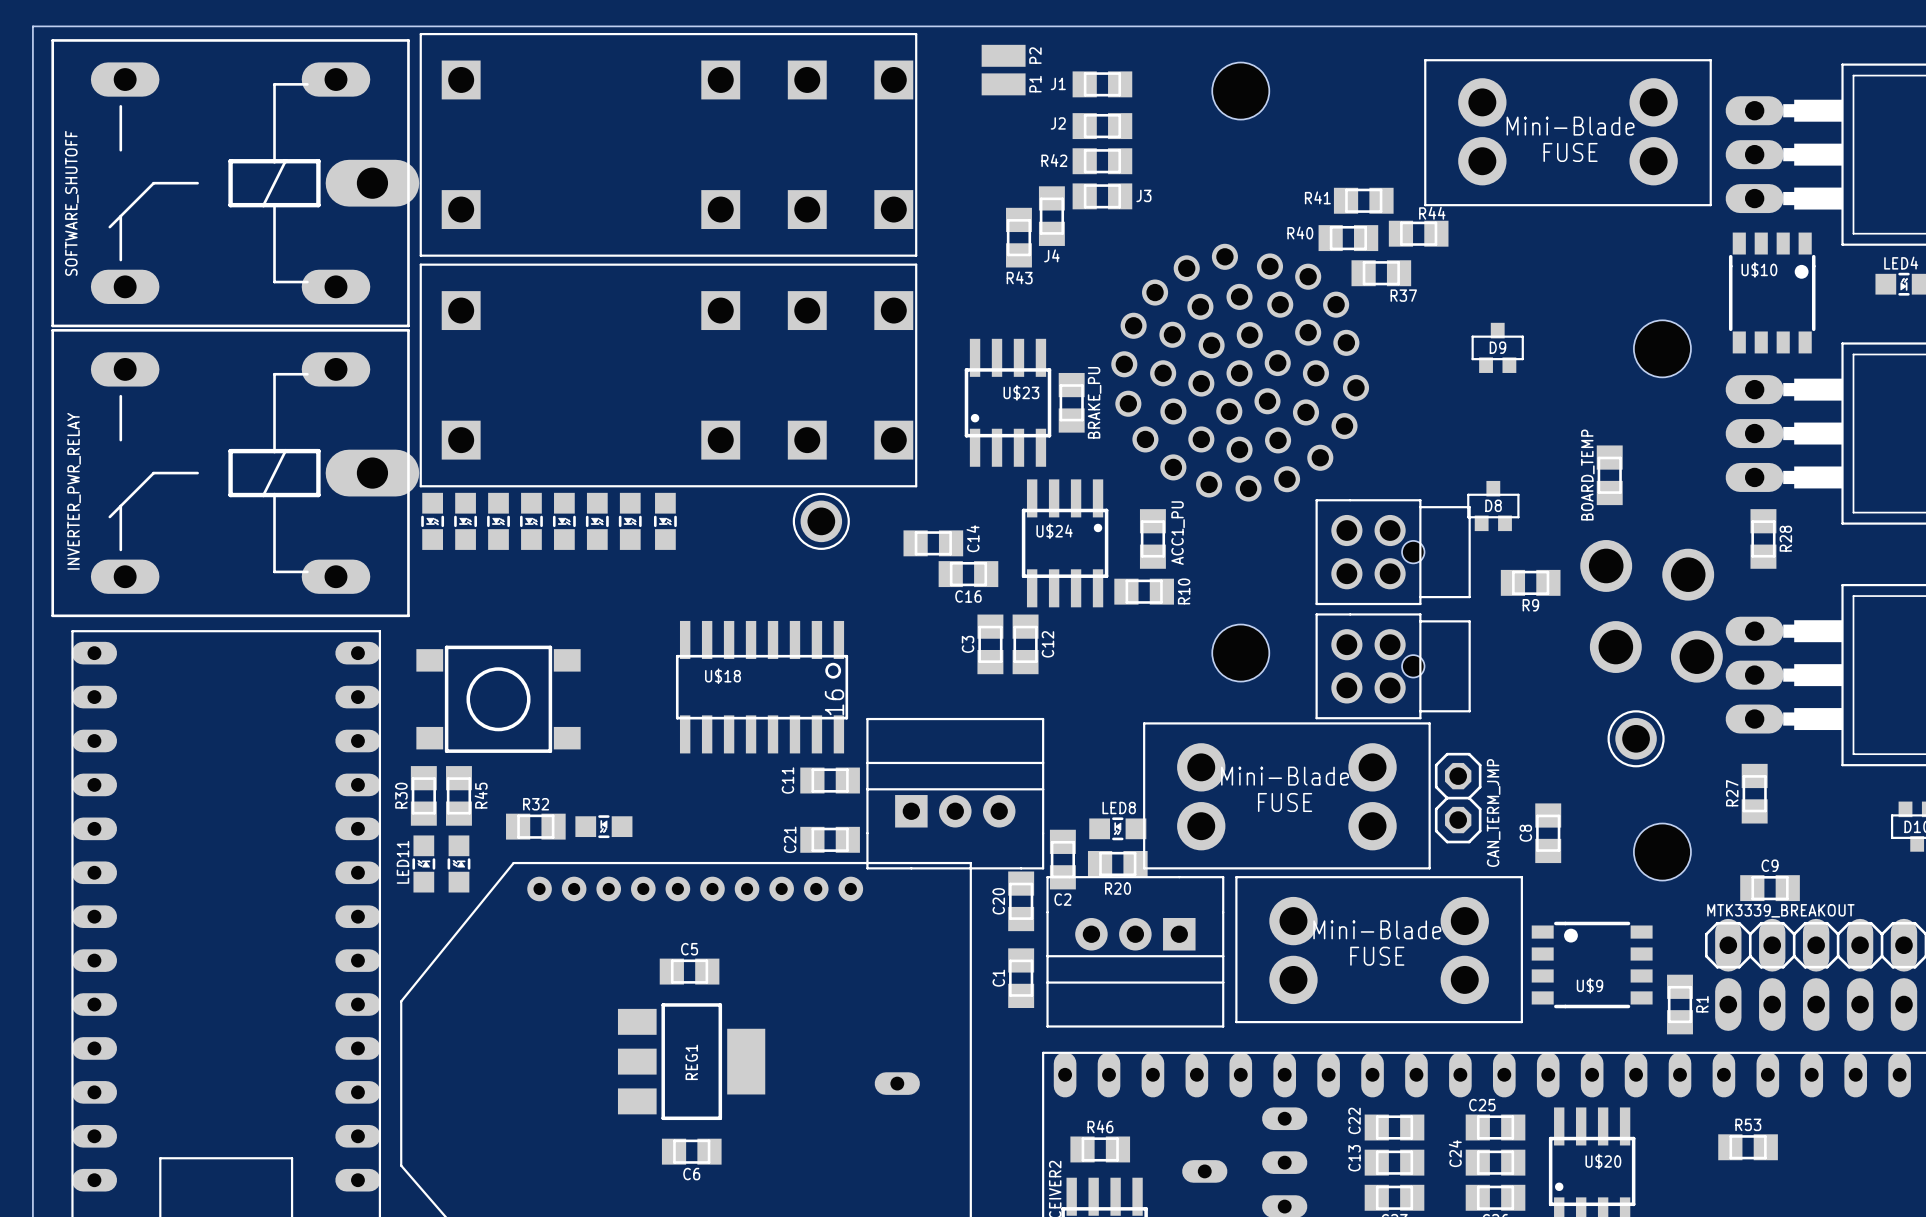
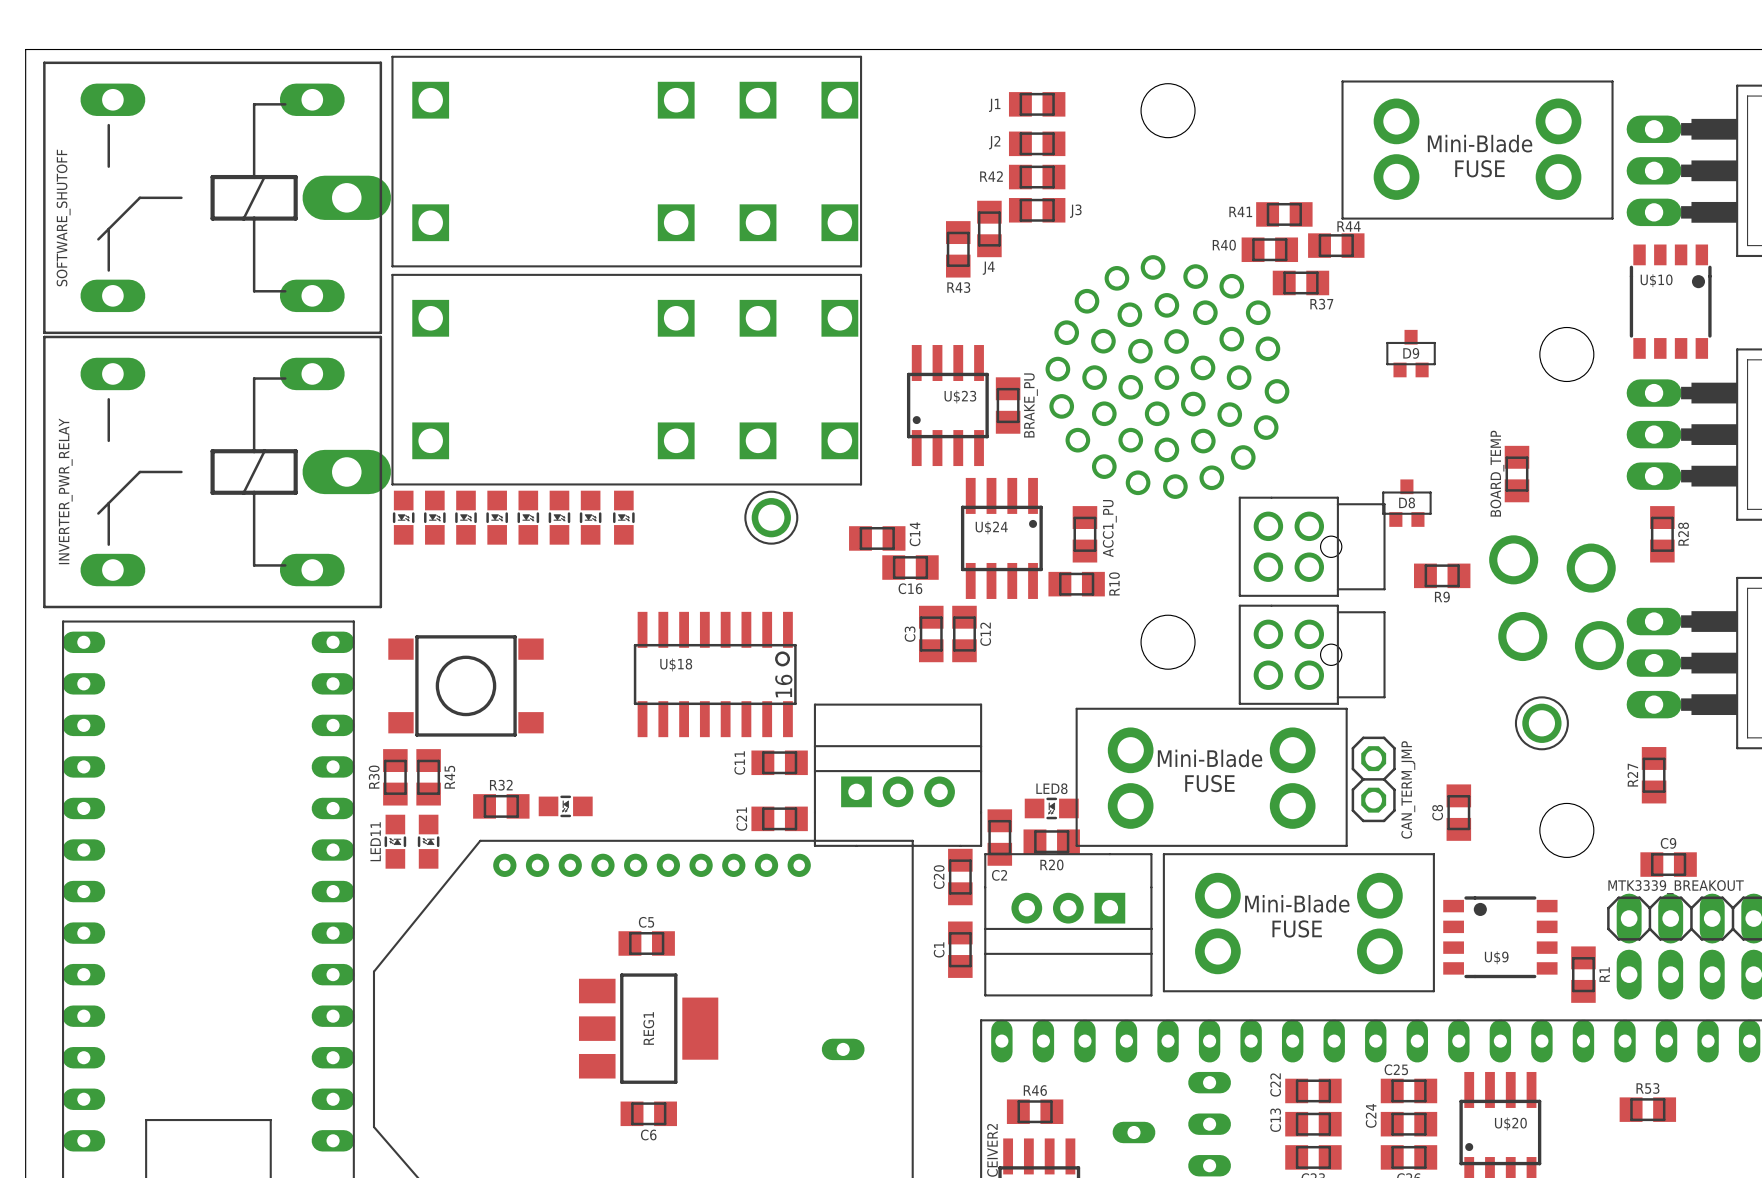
P2: (1003, 55) -> none
P1: (1003, 84) -> none

